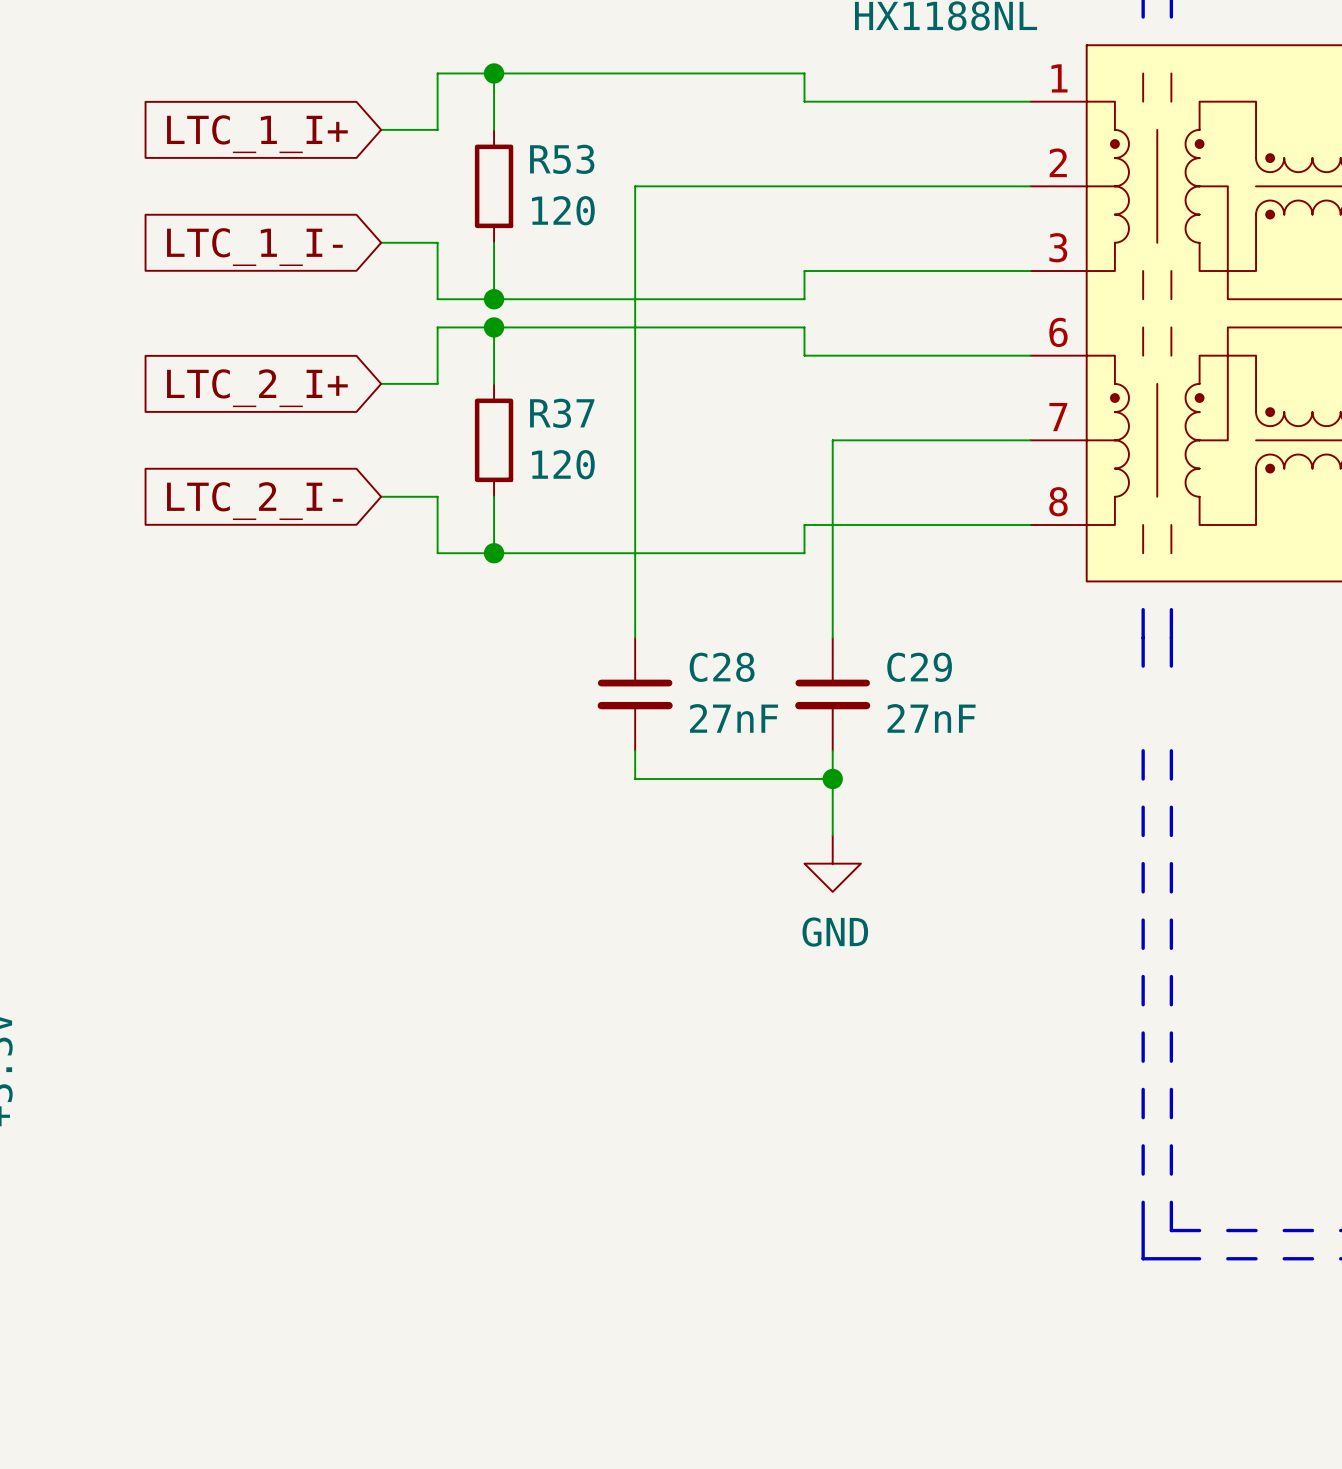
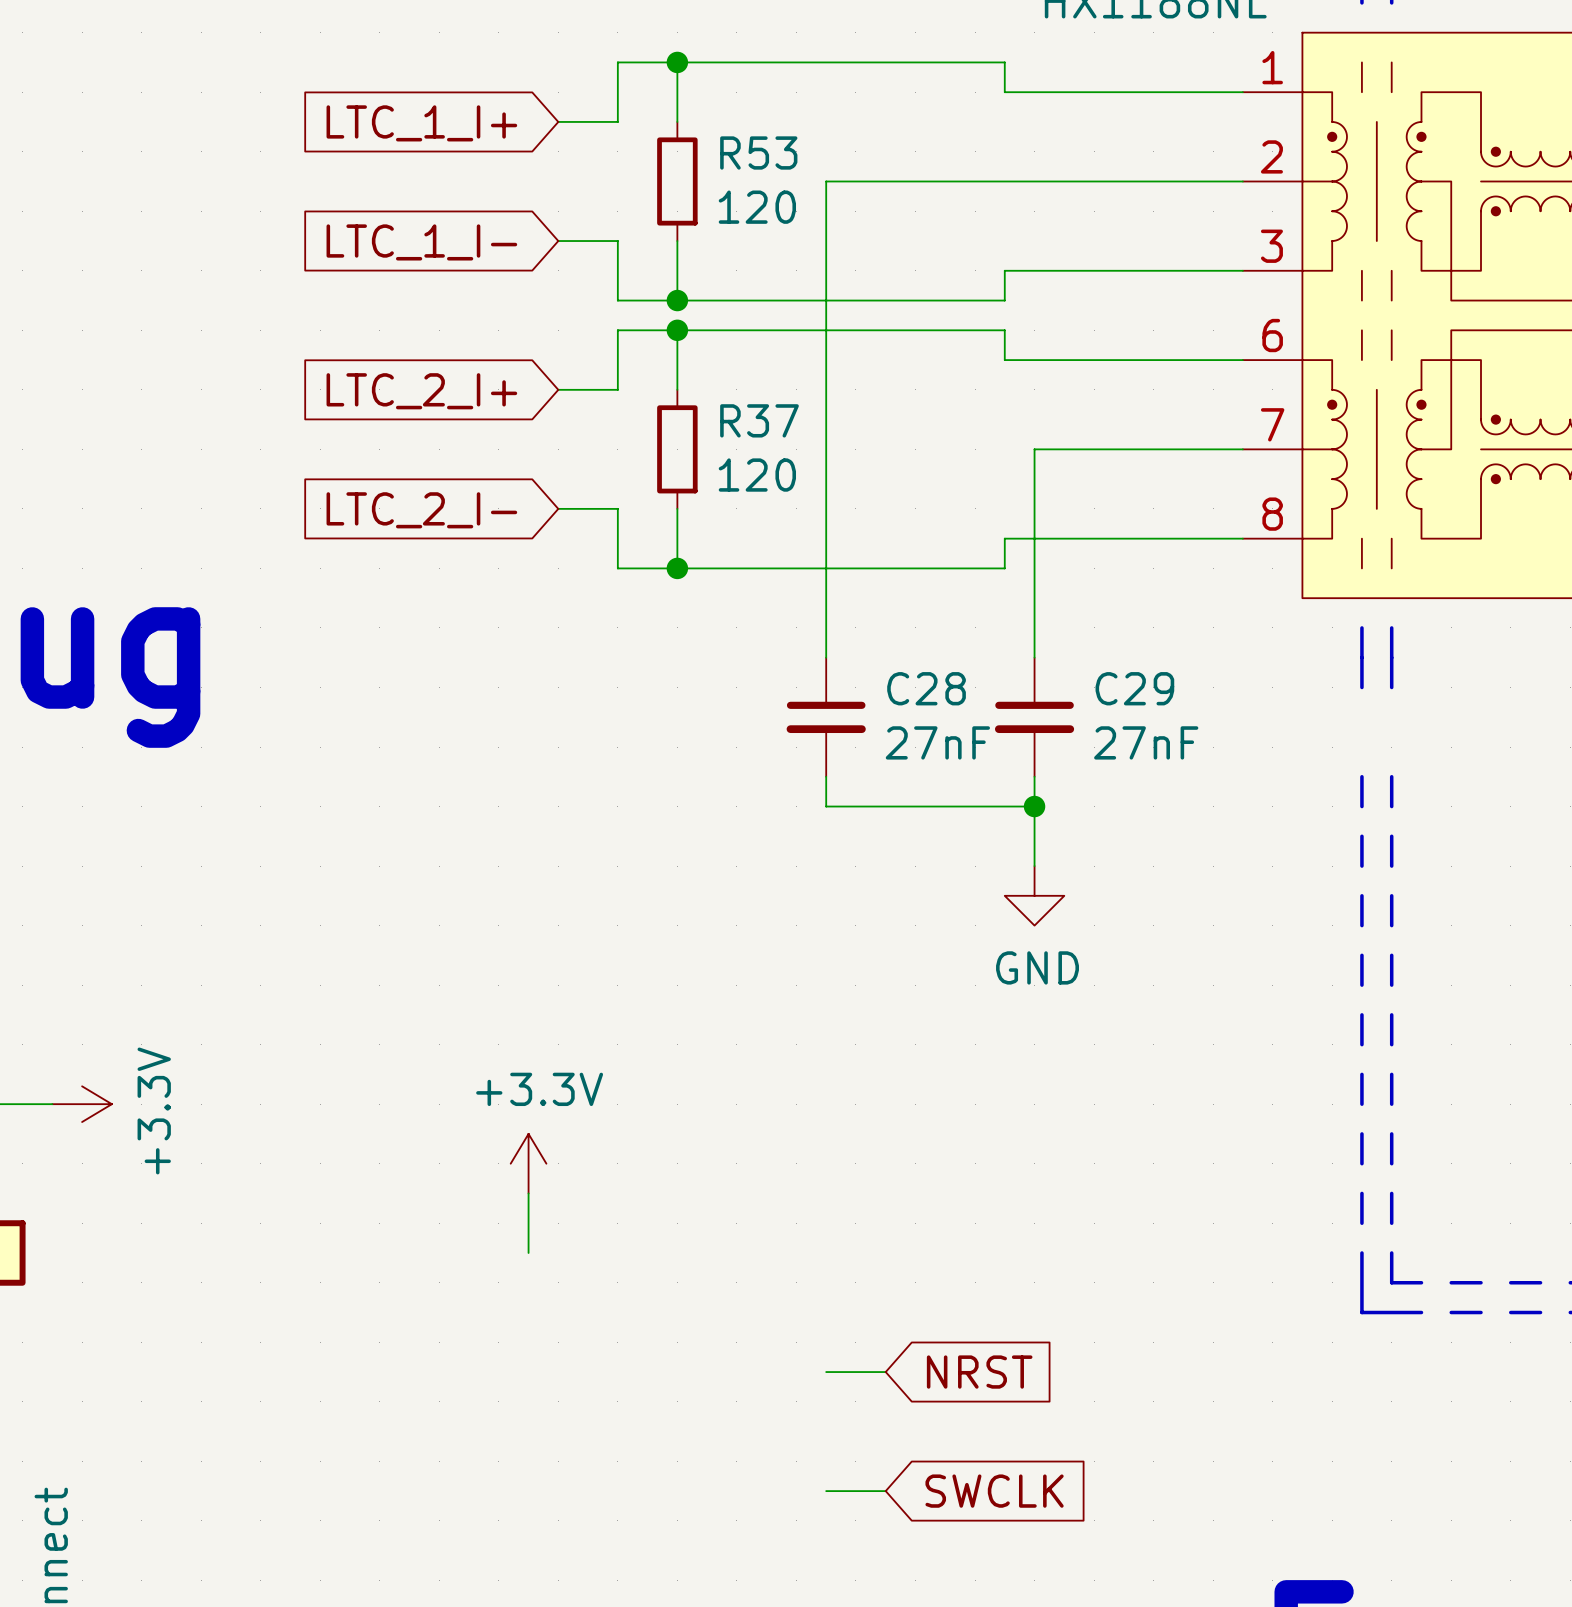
power symbol: none -> +3.3V (528, 1163)
wire: none -> (528, 1193) (528, 1252)
wire: none -> (826, 1372) (885, 1372)
global label: none -> NRST (979, 1372)
wire: none -> (826, 1491) (885, 1491)
global label: none -> SWCLK (994, 1491)

